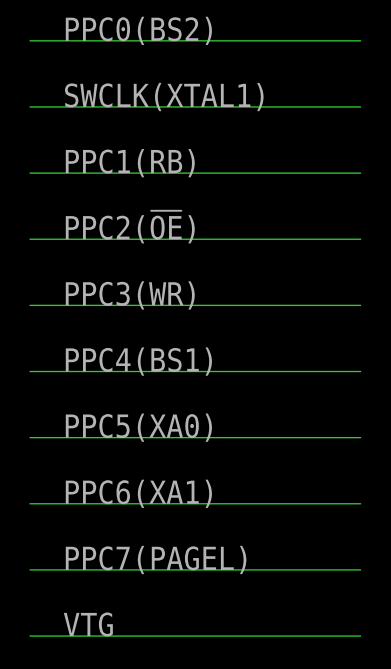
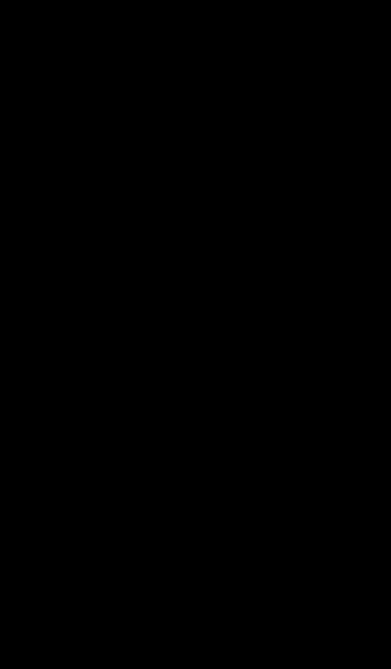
label: PPC0(BS2) (138, 30) -> none
wire: (29, 40) (360, 40) -> none
label: SWCLK(XTAL1) (164, 97) -> none
wire: (29, 106) (360, 106) -> none
label: PPC1(RB) (130, 163) -> none
wire: (29, 173) (360, 173) -> none
label: PPC2(~{OE}) (130, 227) -> none
wire: (29, 239) (360, 239) -> none
label: PPC3(WR) (130, 295) -> none
wire: (29, 305) (360, 305) -> none
label: PPC4(BS1) (138, 361) -> none
wire: (29, 371) (360, 371) -> none
label: PPC5(XA0) (138, 427) -> none
wire: (29, 437) (360, 437) -> none
label: PPC6(XA1) (138, 493) -> none
wire: (29, 503) (360, 503) -> none
label: PPC7(PAGEL) (156, 559) -> none
wire: (29, 569) (360, 569) -> none
label: VTG (88, 624) -> none
wire: (29, 636) (360, 636) -> none

